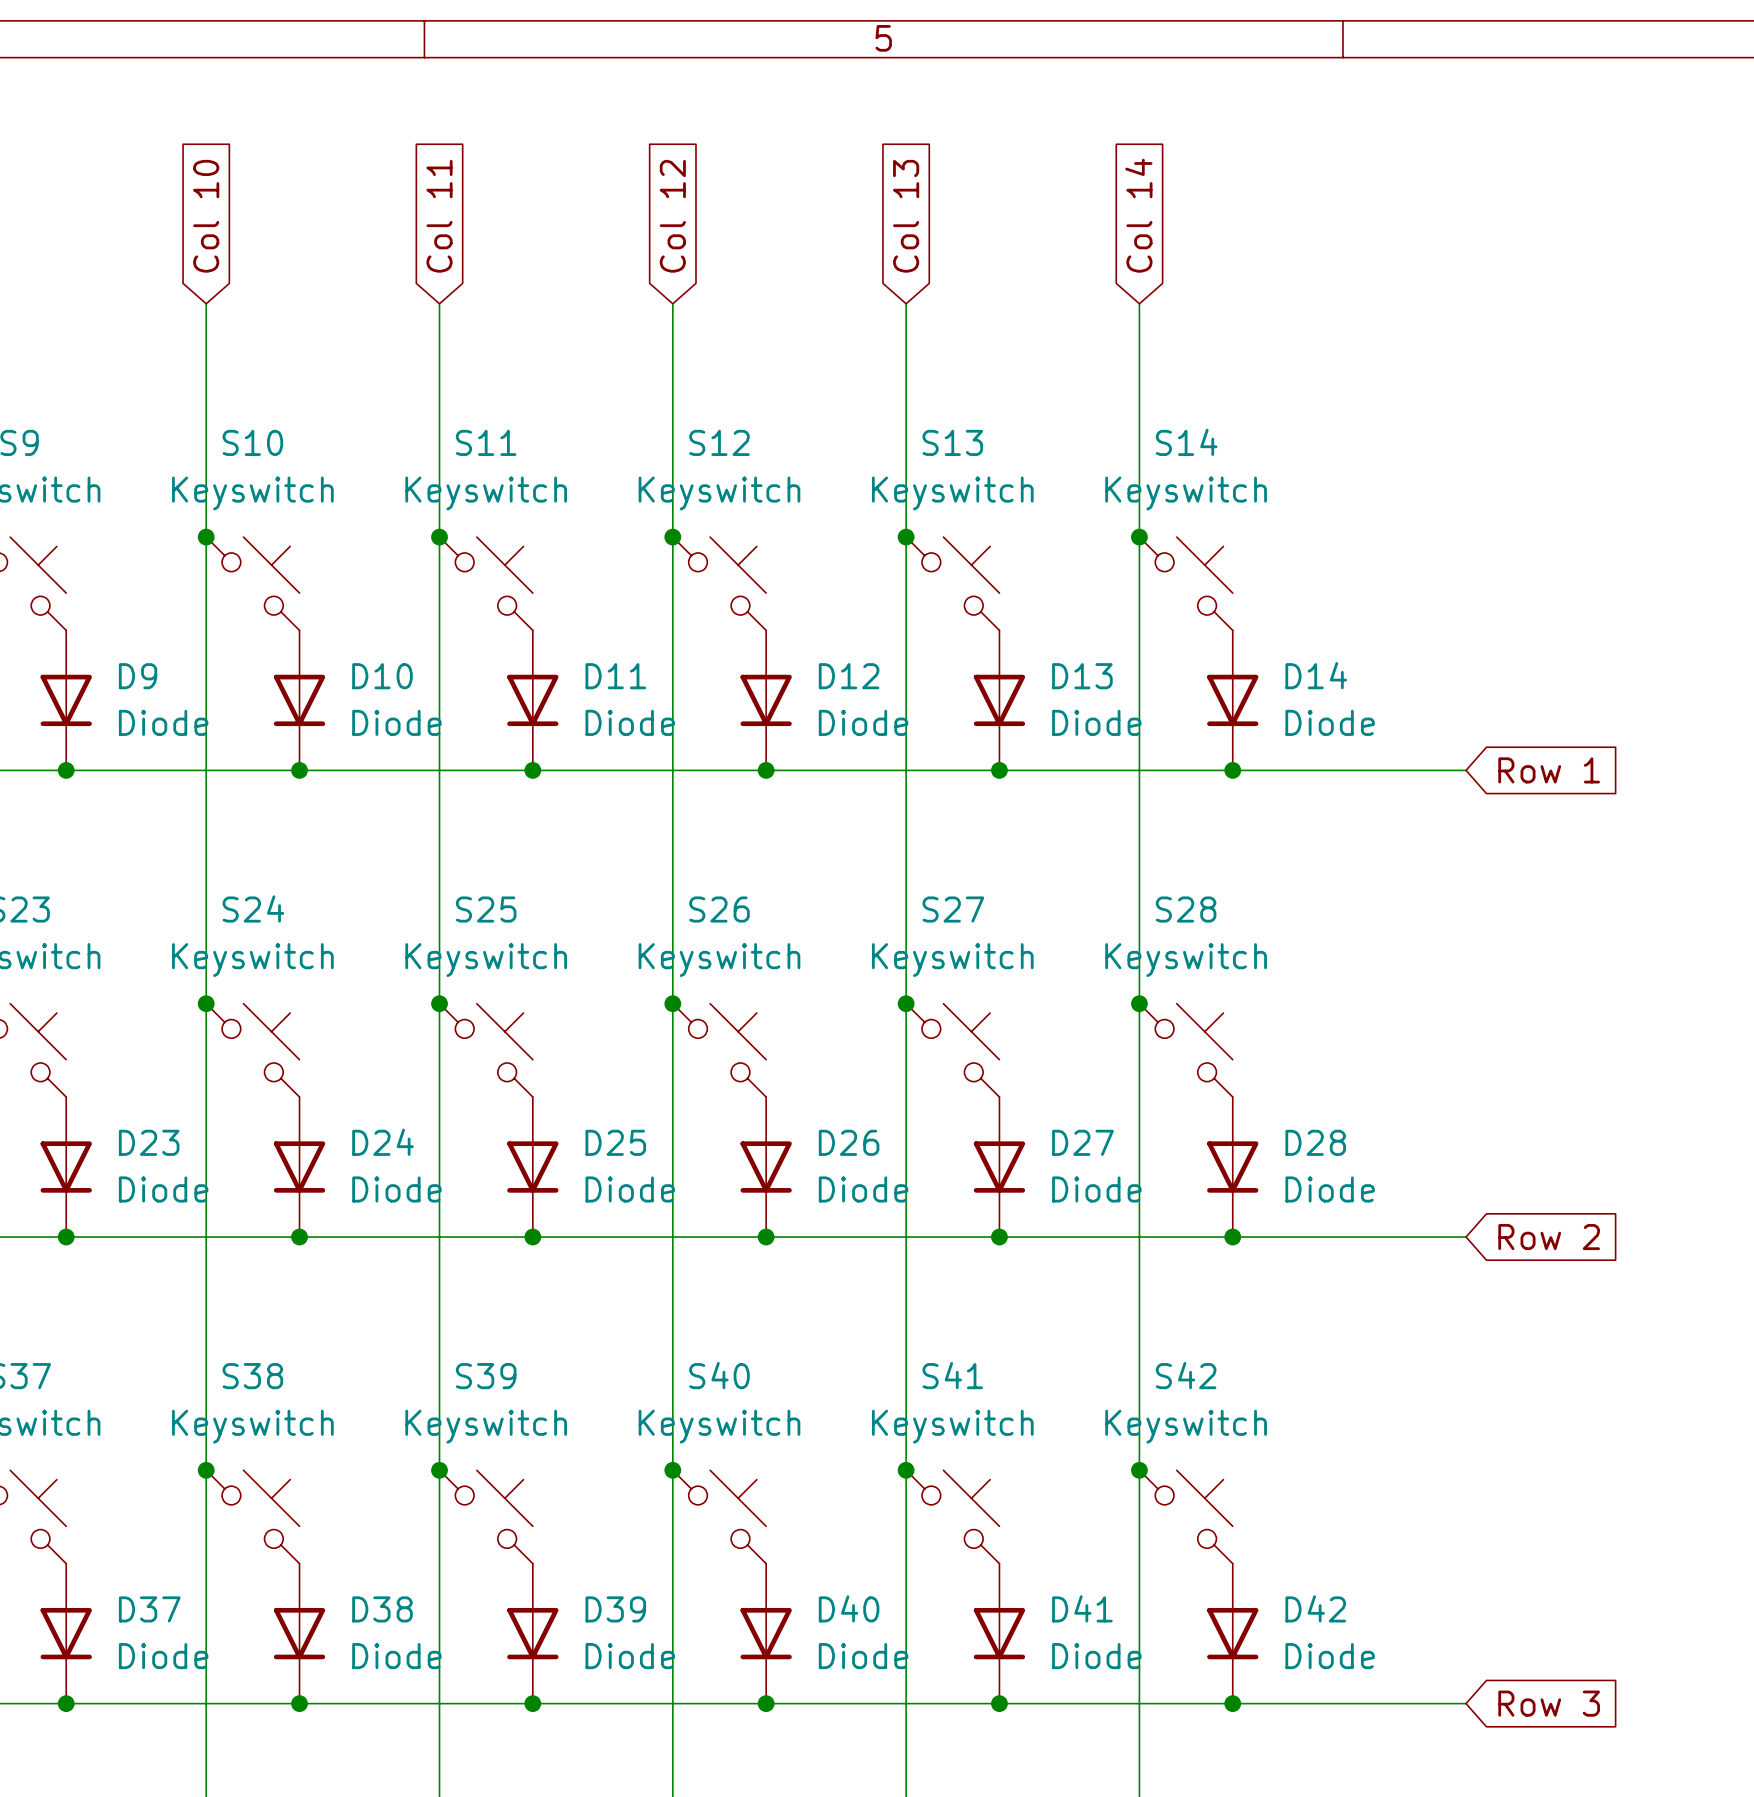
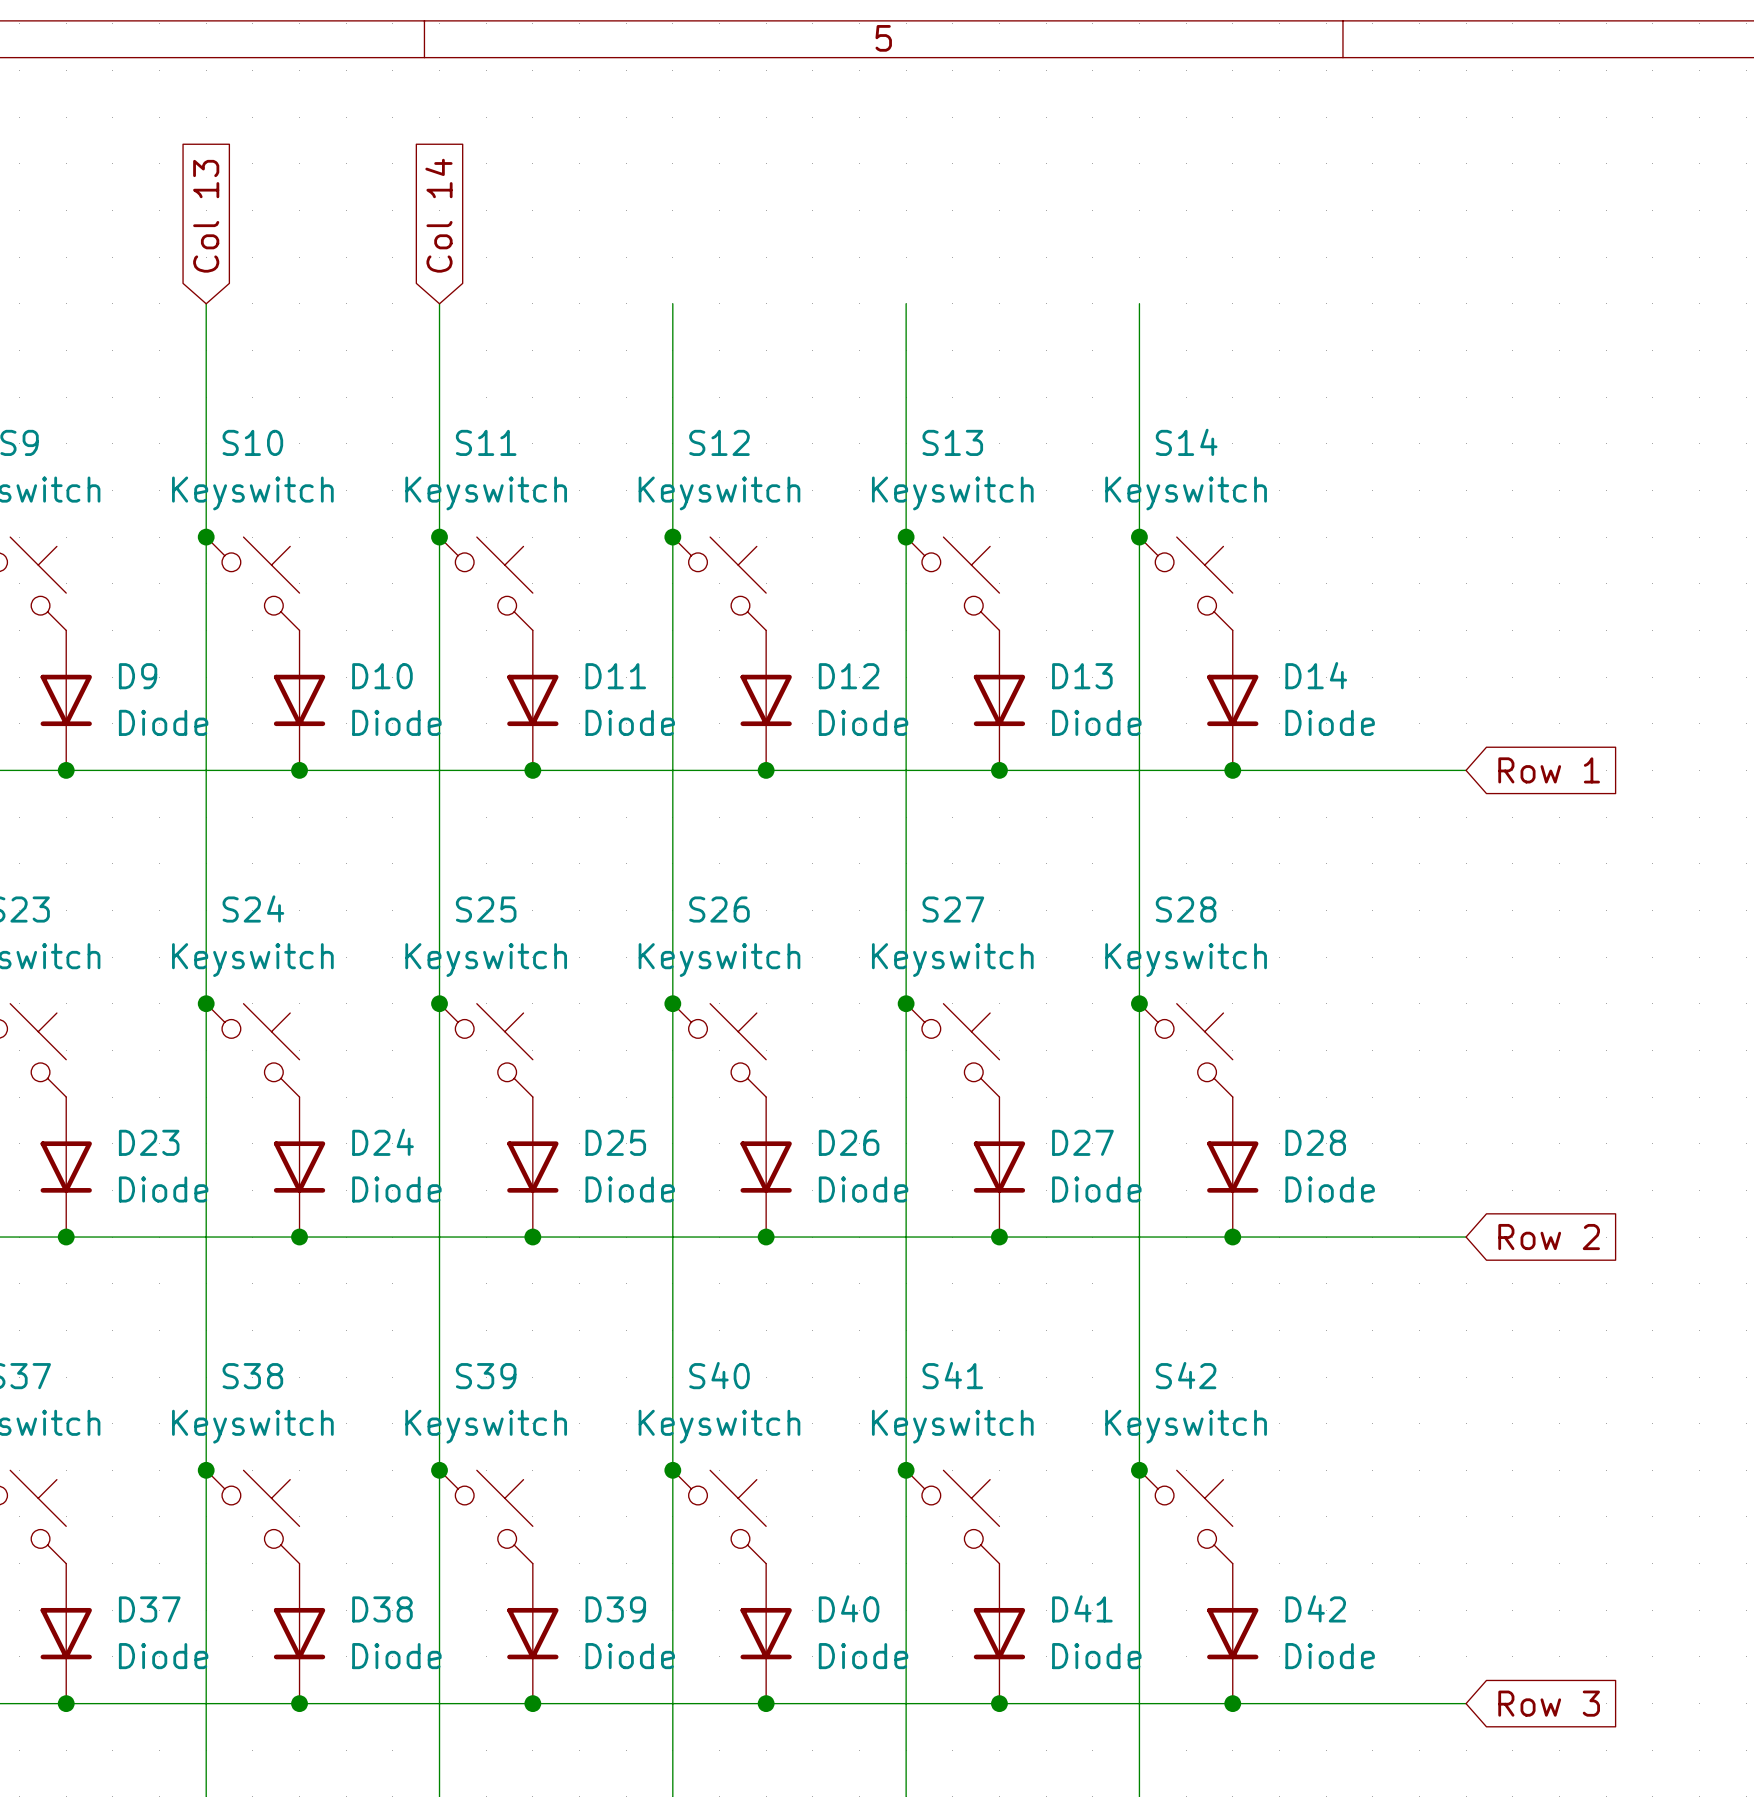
global label: Col 14 (1138, 215) -> none
global label: Col 10 (206, 216) -> Col 13 (206, 216)
global label: Col 11 (439, 216) -> Col 14 (438, 215)
global label: Col 12 (672, 216) -> none
global label: Col 13 (906, 216) -> none

